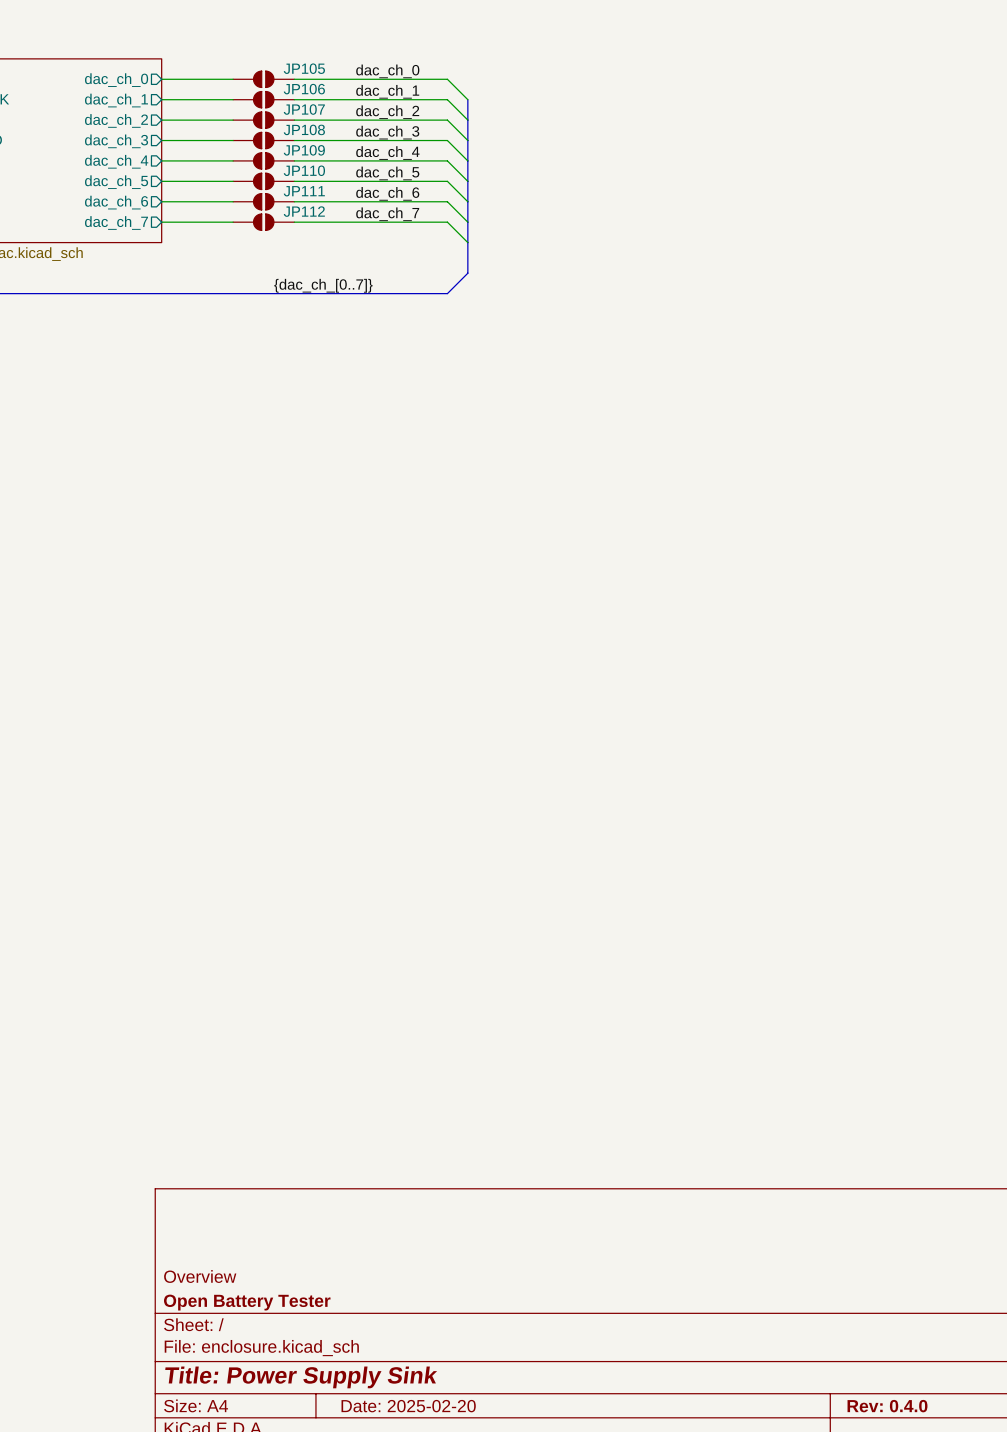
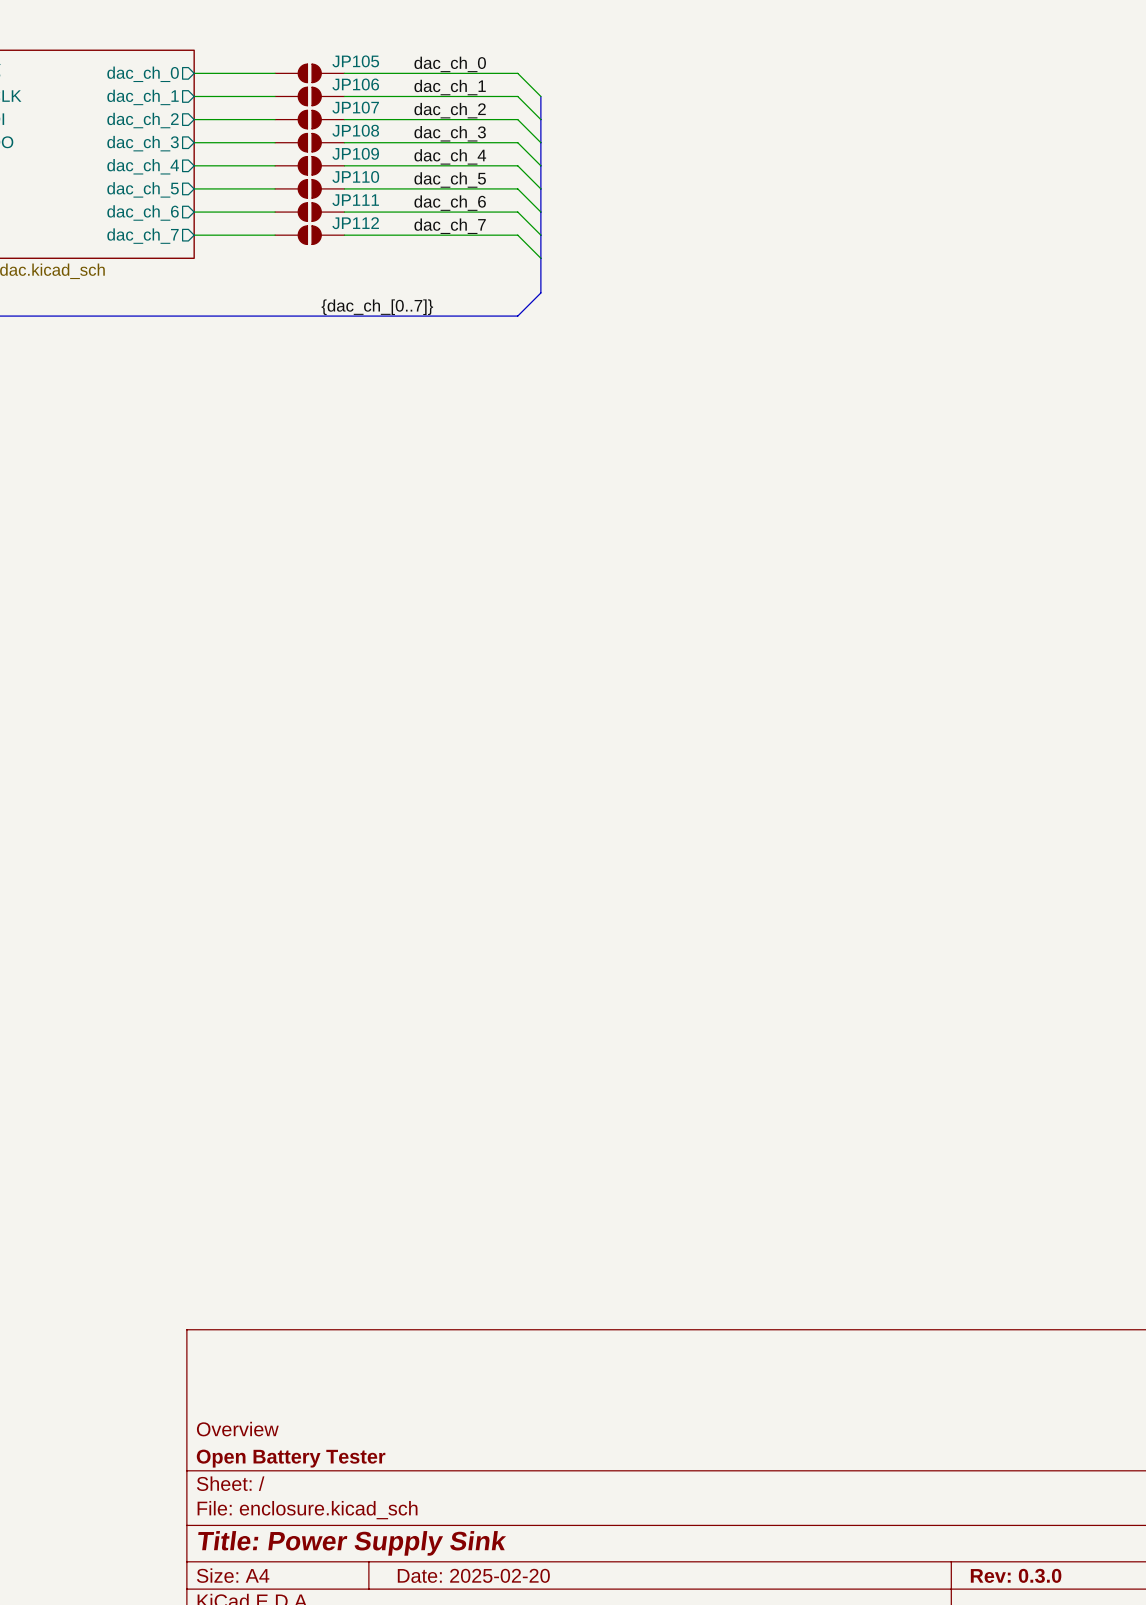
title block: Rev: 0.4.0 (887, 1406) -> Rev: 0.3.0 (1016, 1575)

